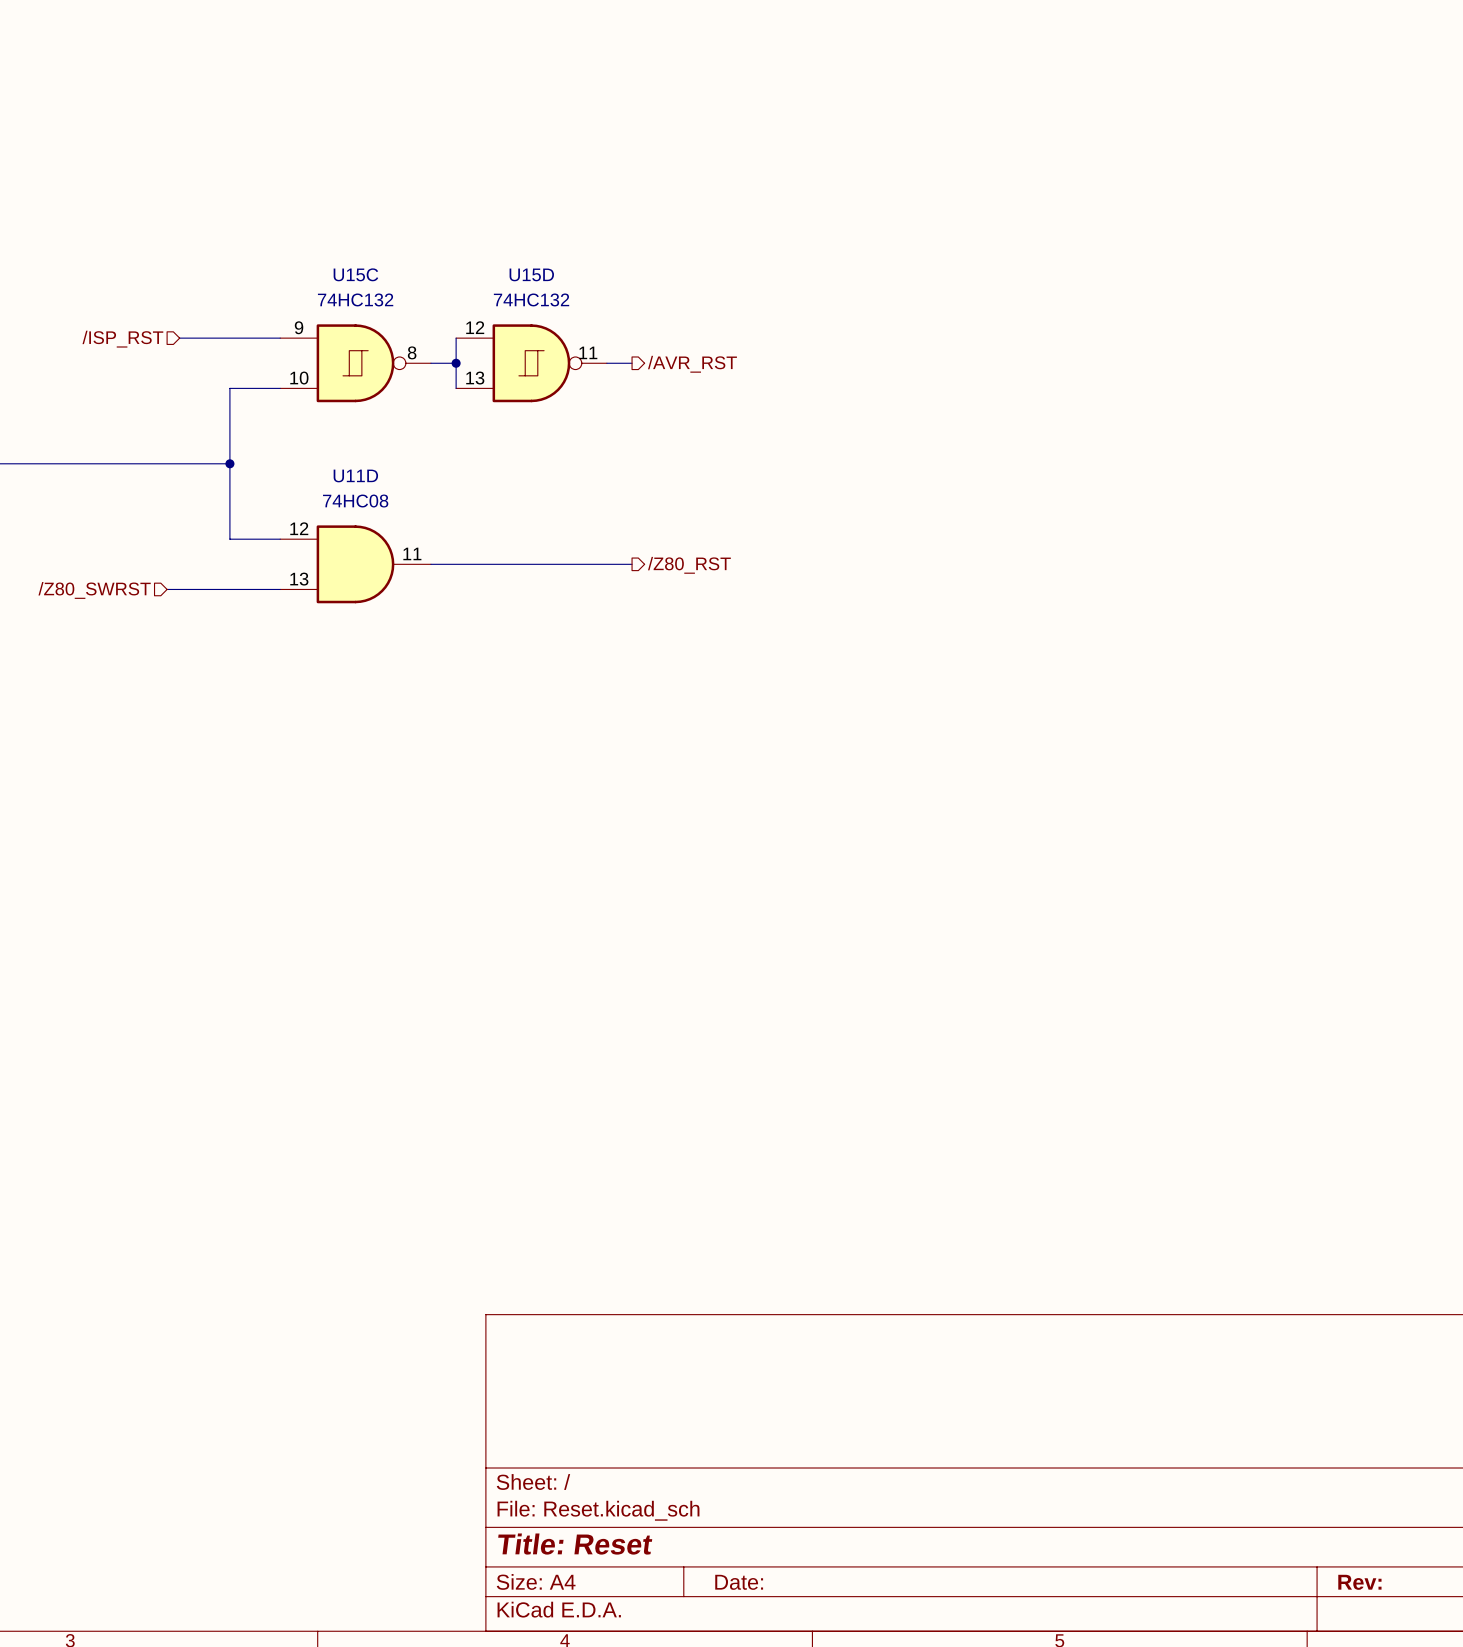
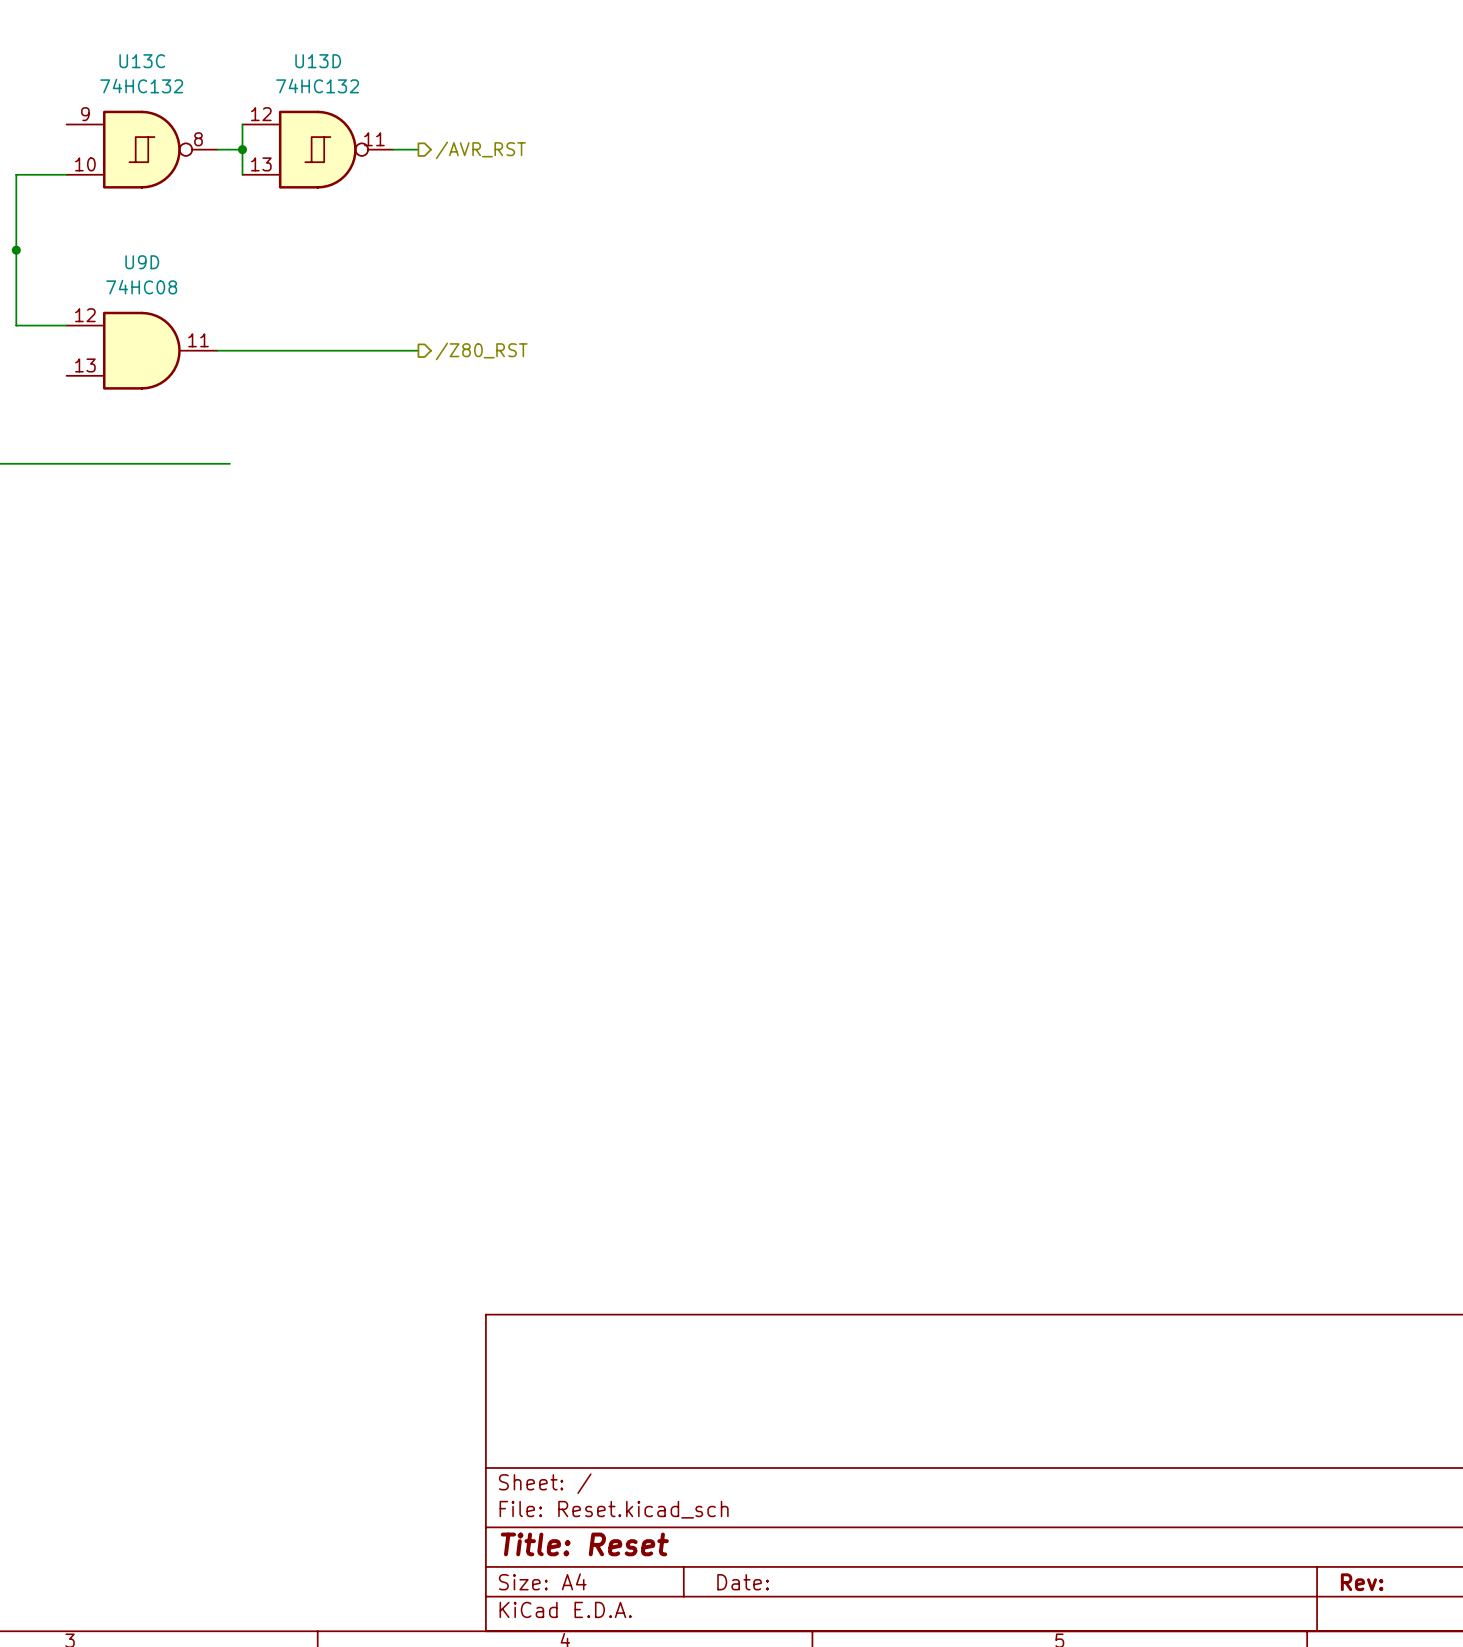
wire: none -> (242, 124) (242, 174)
U13C: none -> 74HC132 (141, 149)
wire: none -> (217, 149) (242, 149)
junction: none -> (242, 149)
U13D: none -> 74HC132 (317, 149)
hierarchical label: none -> /AVR_RST (480, 150)
wire: none -> (66, 174) (16, 174) (16, 325) (66, 325)
junction: none -> (16, 250)
wire: (179, 338) (280, 338) -> none
wire: (456, 338) (456, 388) -> none
hierarchical label: /ISP_RST (122, 339) -> none
U9D: none -> 74HC08 (141, 350)
wire: none -> (217, 350) (418, 350)
hierarchical label: none -> /Z80_RST (481, 351)
U15C: 74HC132 (355, 363) -> none
wire: (430, 363) (456, 363) -> (393, 149) (418, 149)
junction: (456, 363) -> none
U15D: 74HC132 (531, 363) -> none
wire: (606, 363) (632, 363) -> none
hierarchical label: /AVR_RST (692, 364) -> none
wire: (280, 388) (229, 388) (229, 539) (280, 539) -> none
junction: (229, 463) -> none
U11D: 74HC08 (355, 564) -> none
wire: (430, 564) (632, 564) -> none
hierarchical label: /Z80_RST (689, 565) -> none
wire: (167, 589) (280, 589) -> none
hierarchical label: /Z80_SWRST (94, 590) -> none

